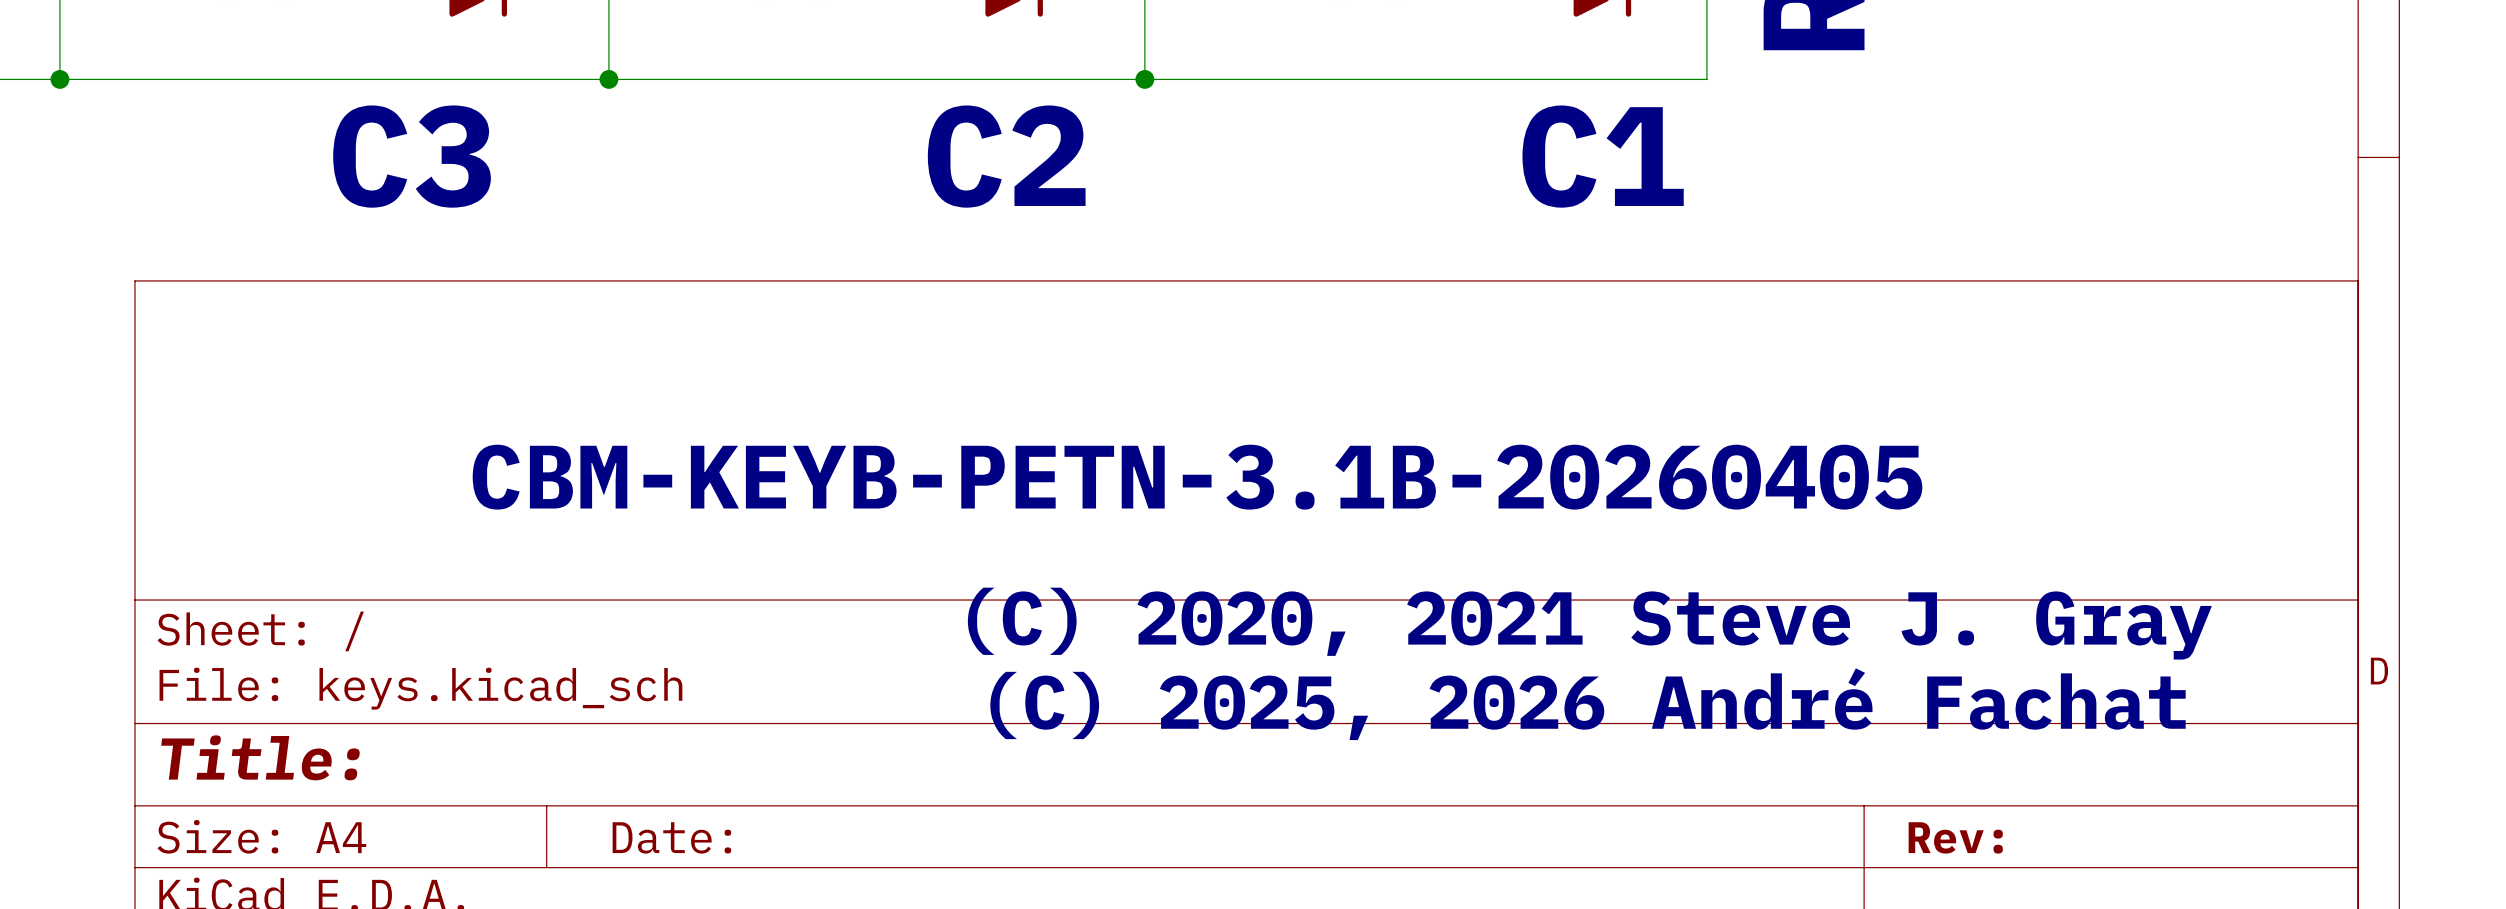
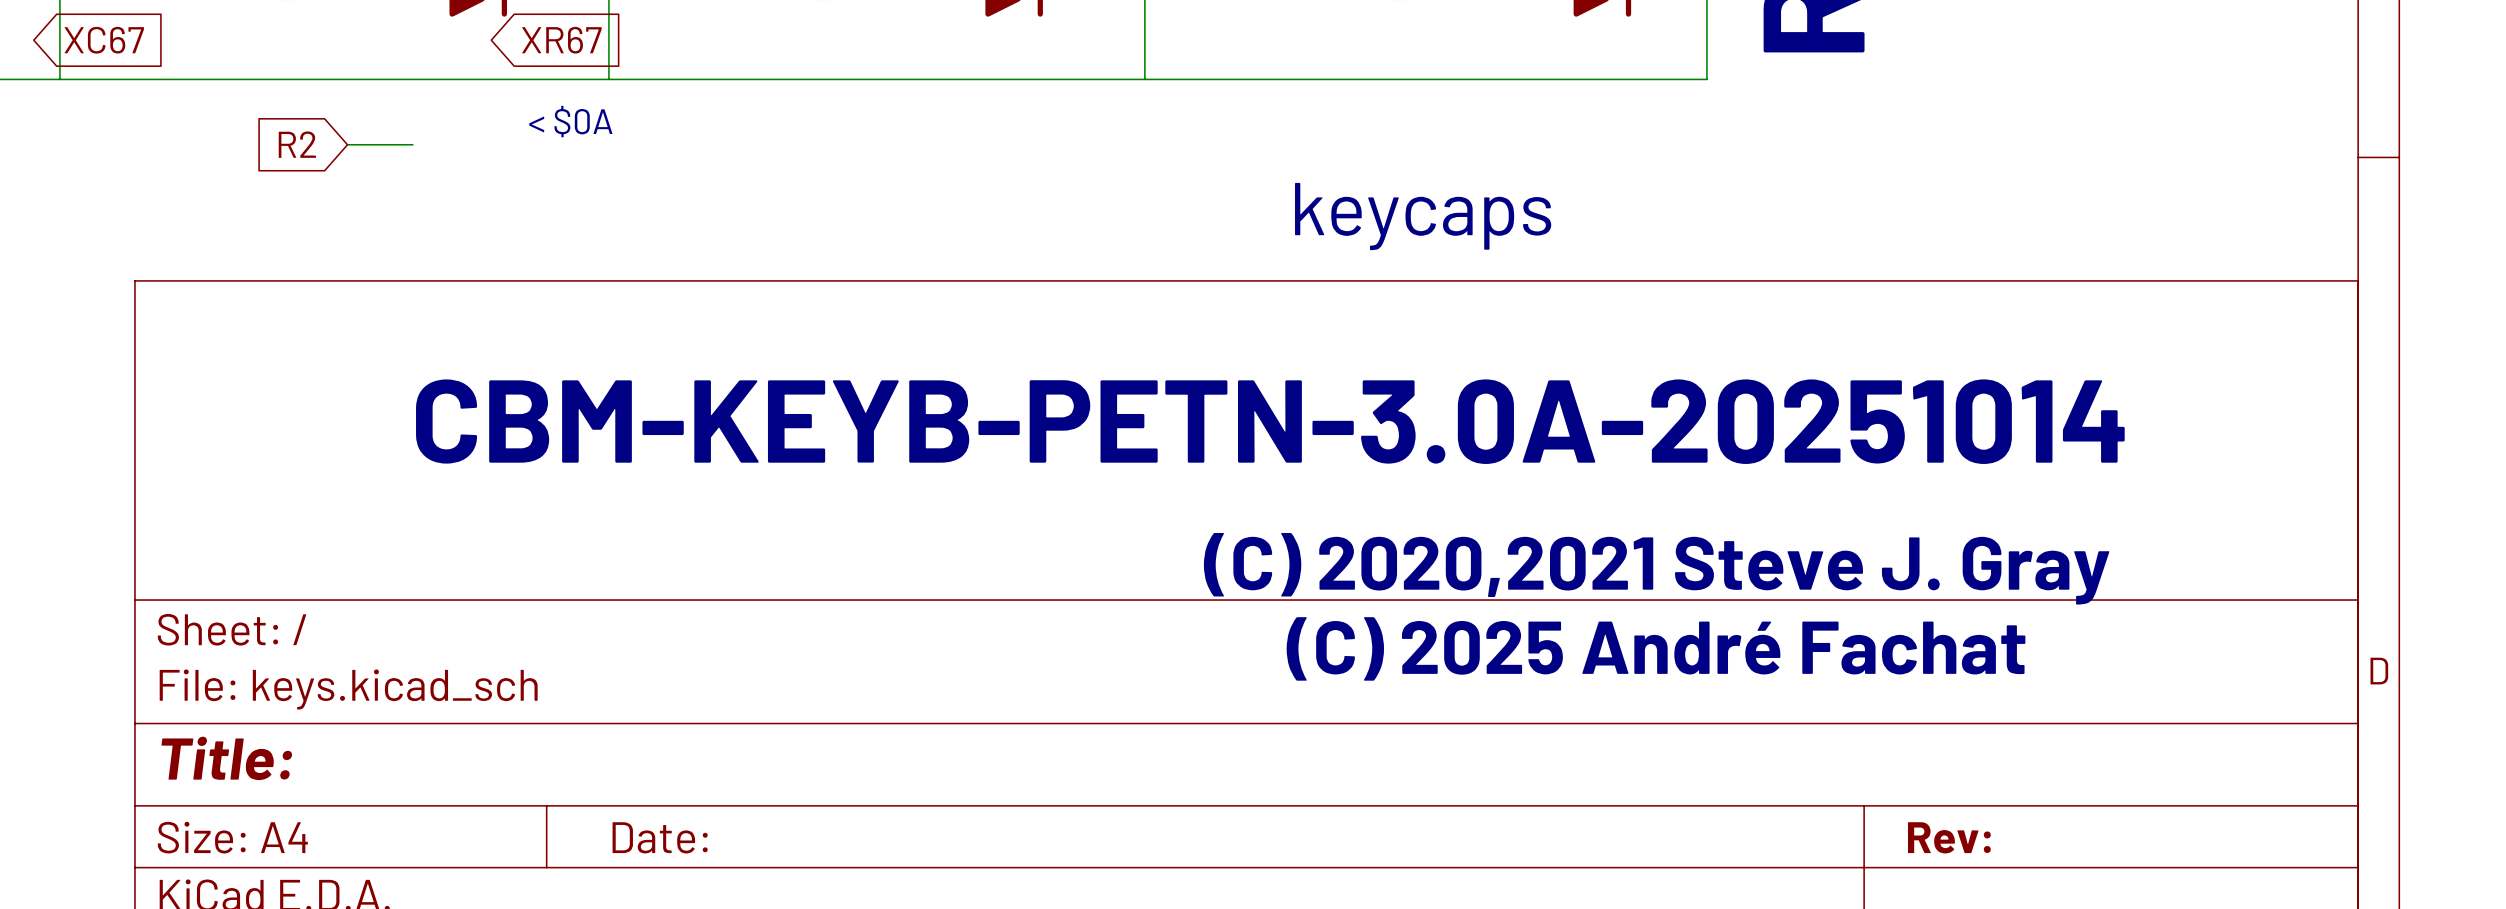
global label: none -> XC67 (104, 40)
global label: none -> XR67 (561, 40)
junction: (59, 79) -> none
junction: (608, 79) -> none
junction: (1144, 79) -> none
text: none -> < $0A (570, 121)
global label: none -> R2 (297, 144)
wire: none -> (347, 144) (412, 144)
text: none -> keycaps (1423, 216)
text: CBM-KEYB-PETN-3.1B-20260405 (1197, 477) -> CBM-KEYB-PETN-3.0A-20251014 (1270, 421)
text: (C) 2020, 2021 Steve J. Gray (1589, 623) -> (C) 2020,2021 Steve J. Gray (1656, 568)
text: (C) 2025, 2026 André Fachat (1588, 704) -> (C) 2025 André Fachat (1656, 648)

